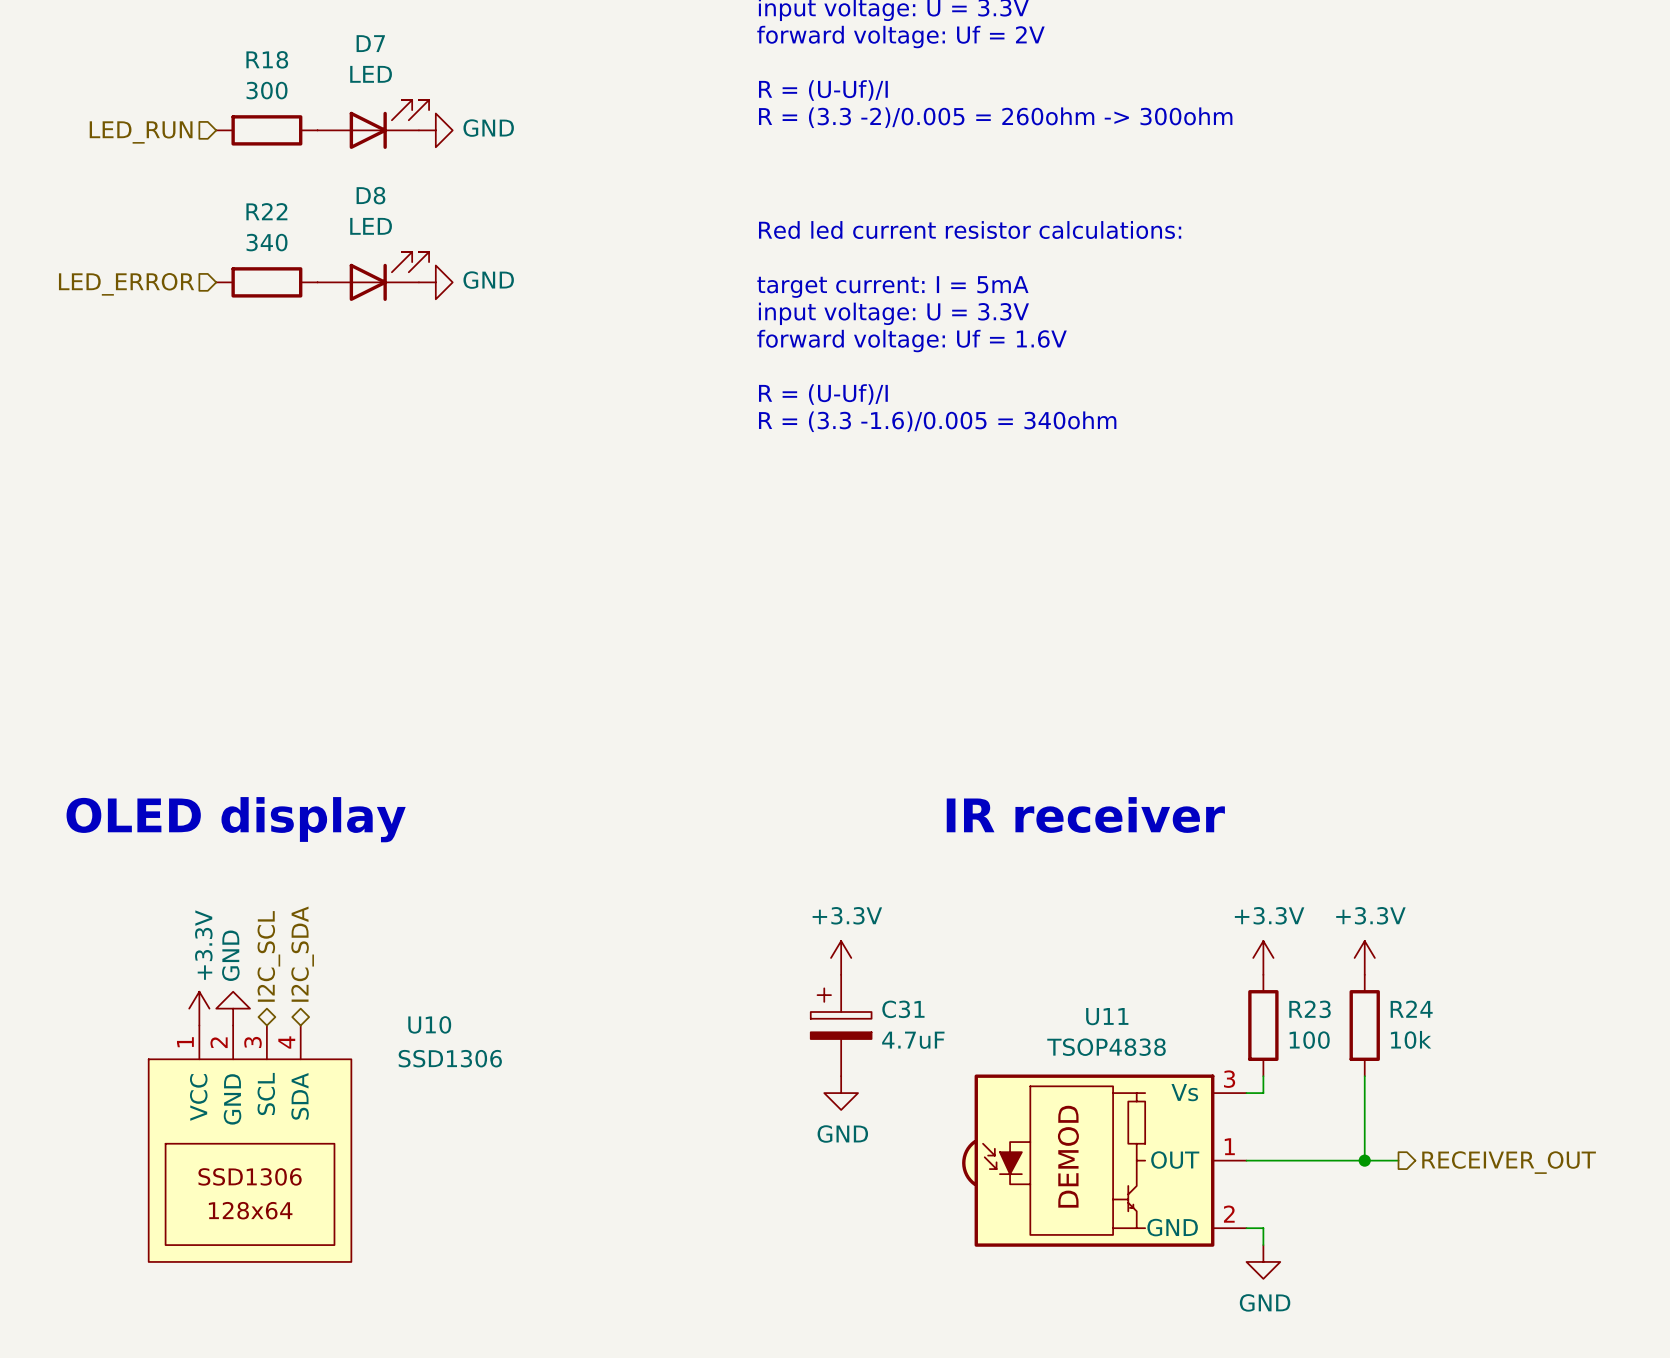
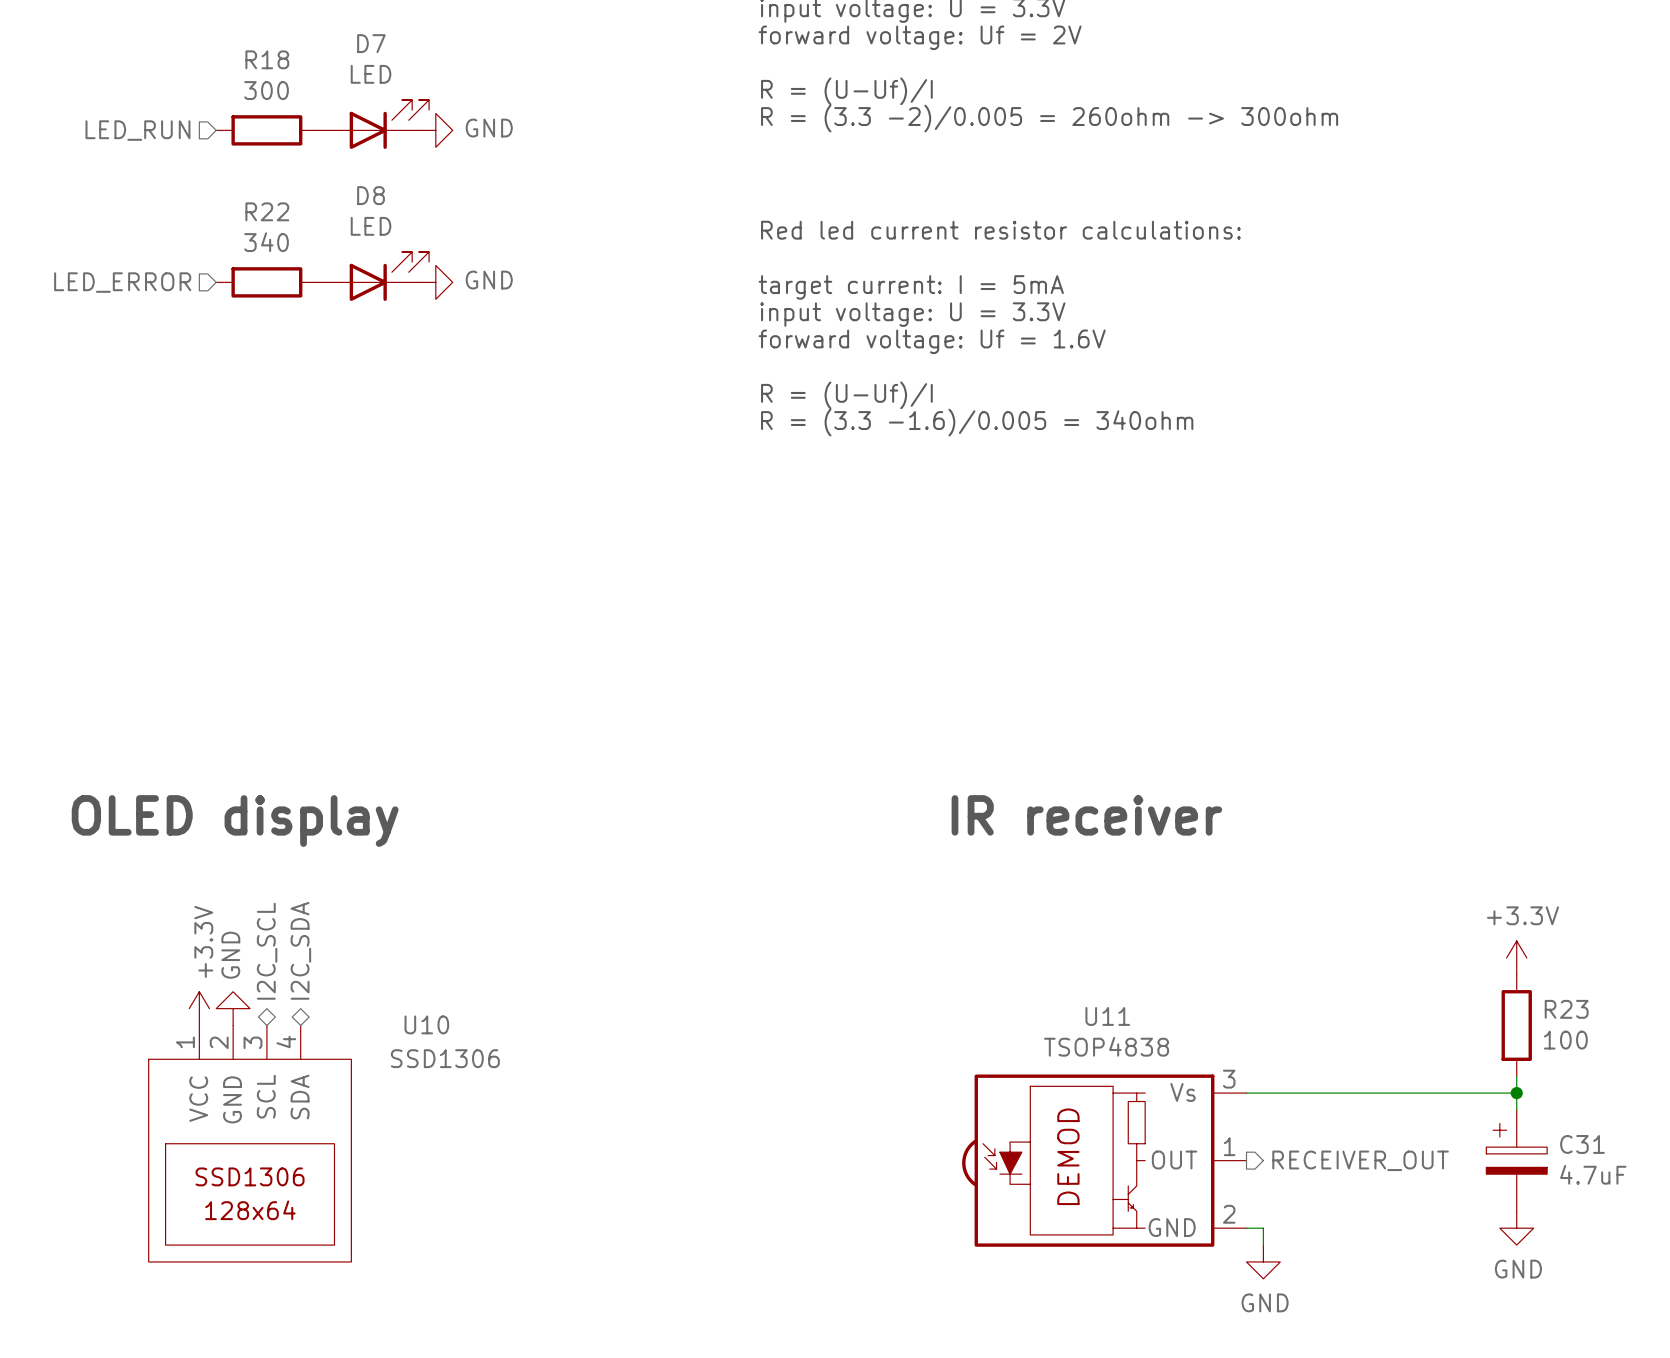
power symbol: +3.3V (841, 957) -> none
power symbol: +3.3V (1263, 957) -> none
power symbol: +3.3V (1364, 957) -> none
power symbol: none -> +3.3V (1516, 957)
C31 position: (841, 1025) -> (1516, 1160)
R23 position: (1263, 1025) -> (1516, 1025)
R24: 10k (1364, 1025) -> none
wire: (1263, 1076) (1263, 1093) -> (1516, 1093) (1263, 1093)
wire: (1364, 1076) (1364, 1160) -> none
wire: none -> (1516, 1076) (1516, 1109)
power symbol: GND (841, 1093) -> none
junction: none -> (1516, 1093)
wire: (1246, 1160) (1398, 1160) -> none
junction: (1364, 1160) -> none
hierarchical label position: RECEIVER_OUT (1509, 1162) -> RECEIVER_OUT (1360, 1160)
power symbol: none -> GND (1516, 1228)

